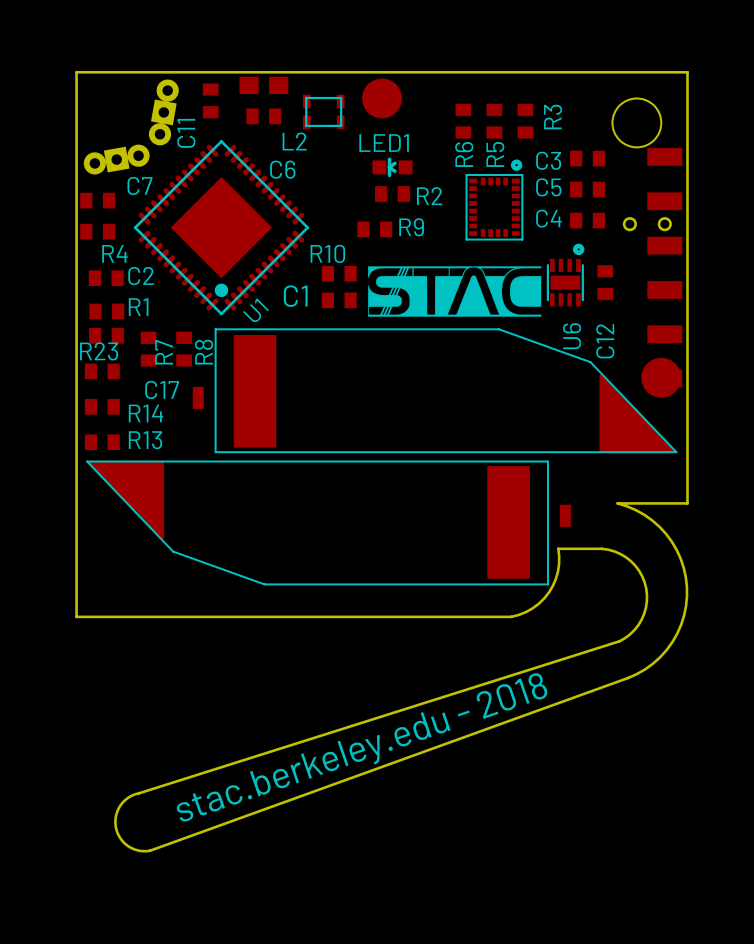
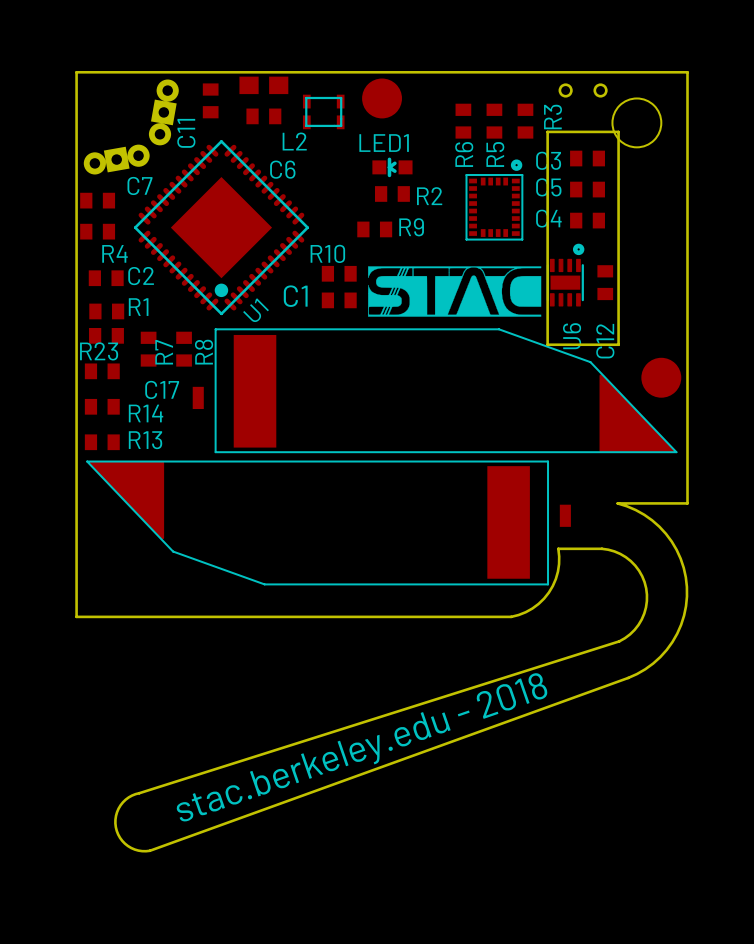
board edge: none -> (547, 131) (547, 344) (618, 344) (618, 131) (547, 131)
part position: (647, 224) -> (583, 90)
part: (664, 267) -> none

